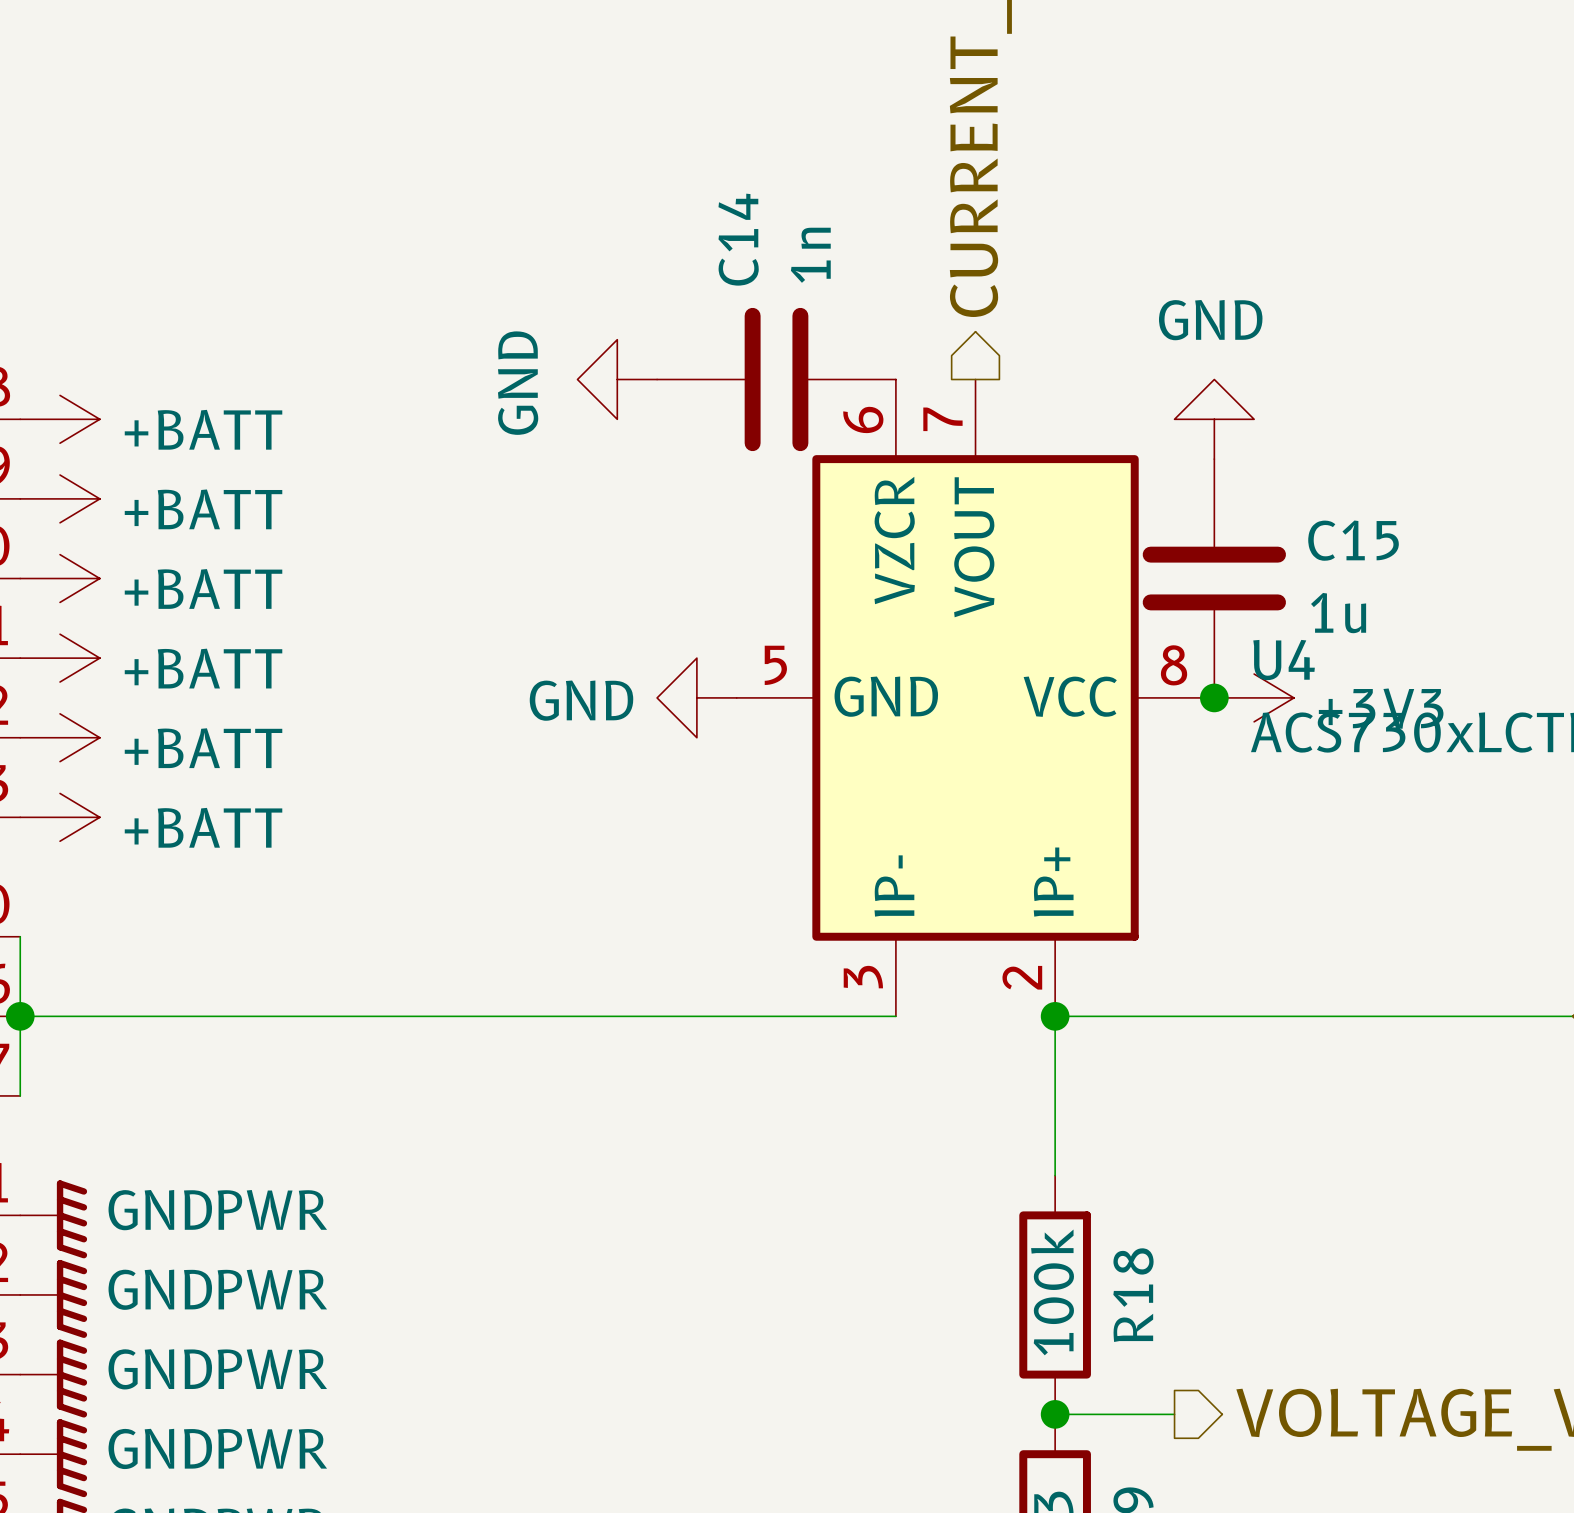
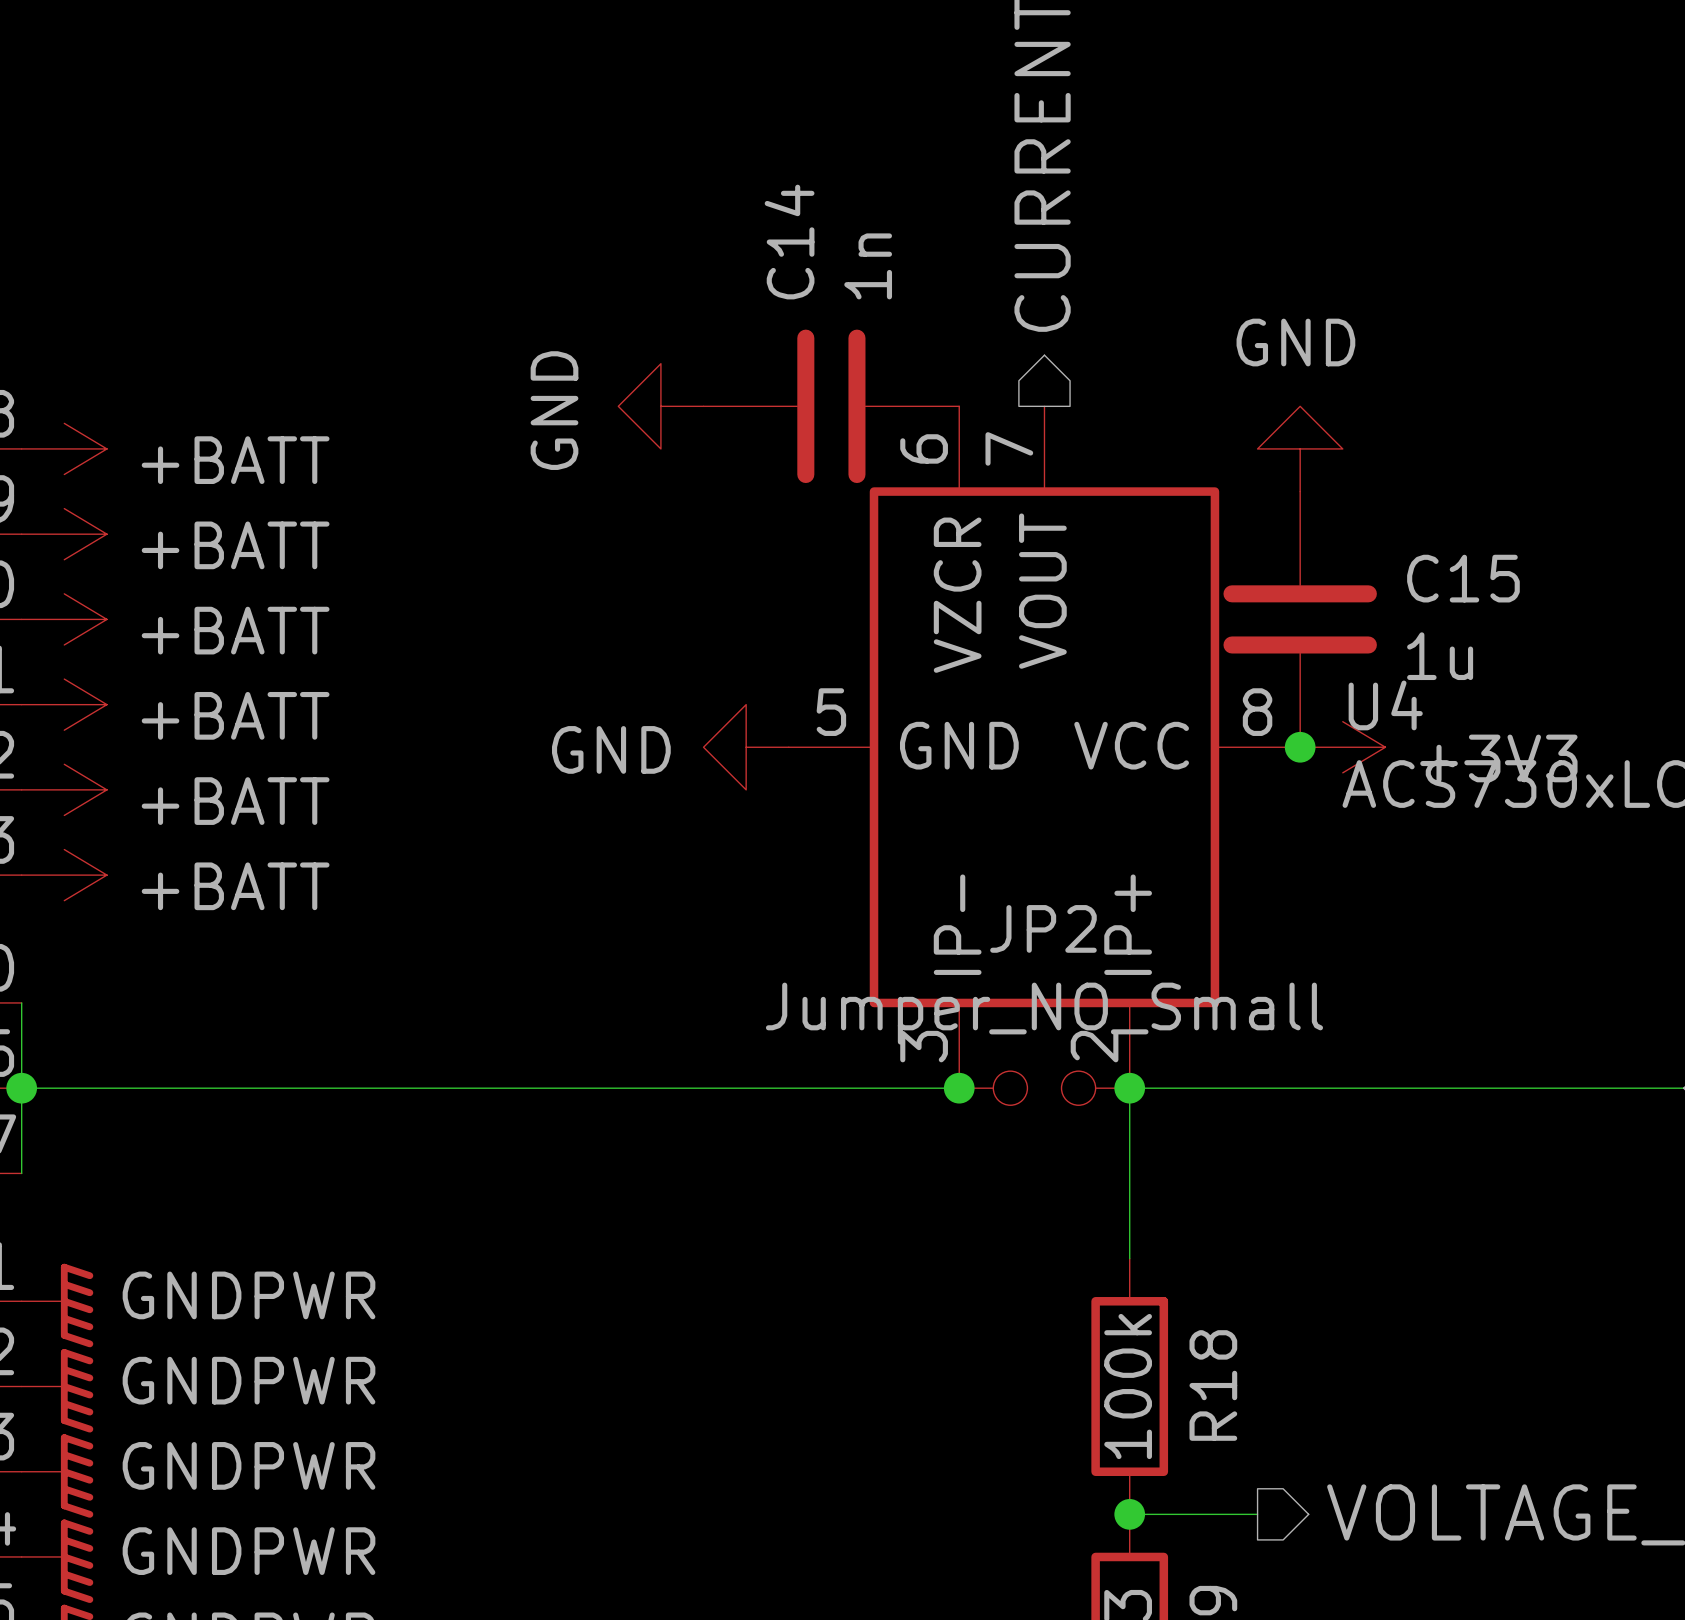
junction: none -> (959, 1088)
JP2: none -> Jumper_NO_Small (1044, 1088)

